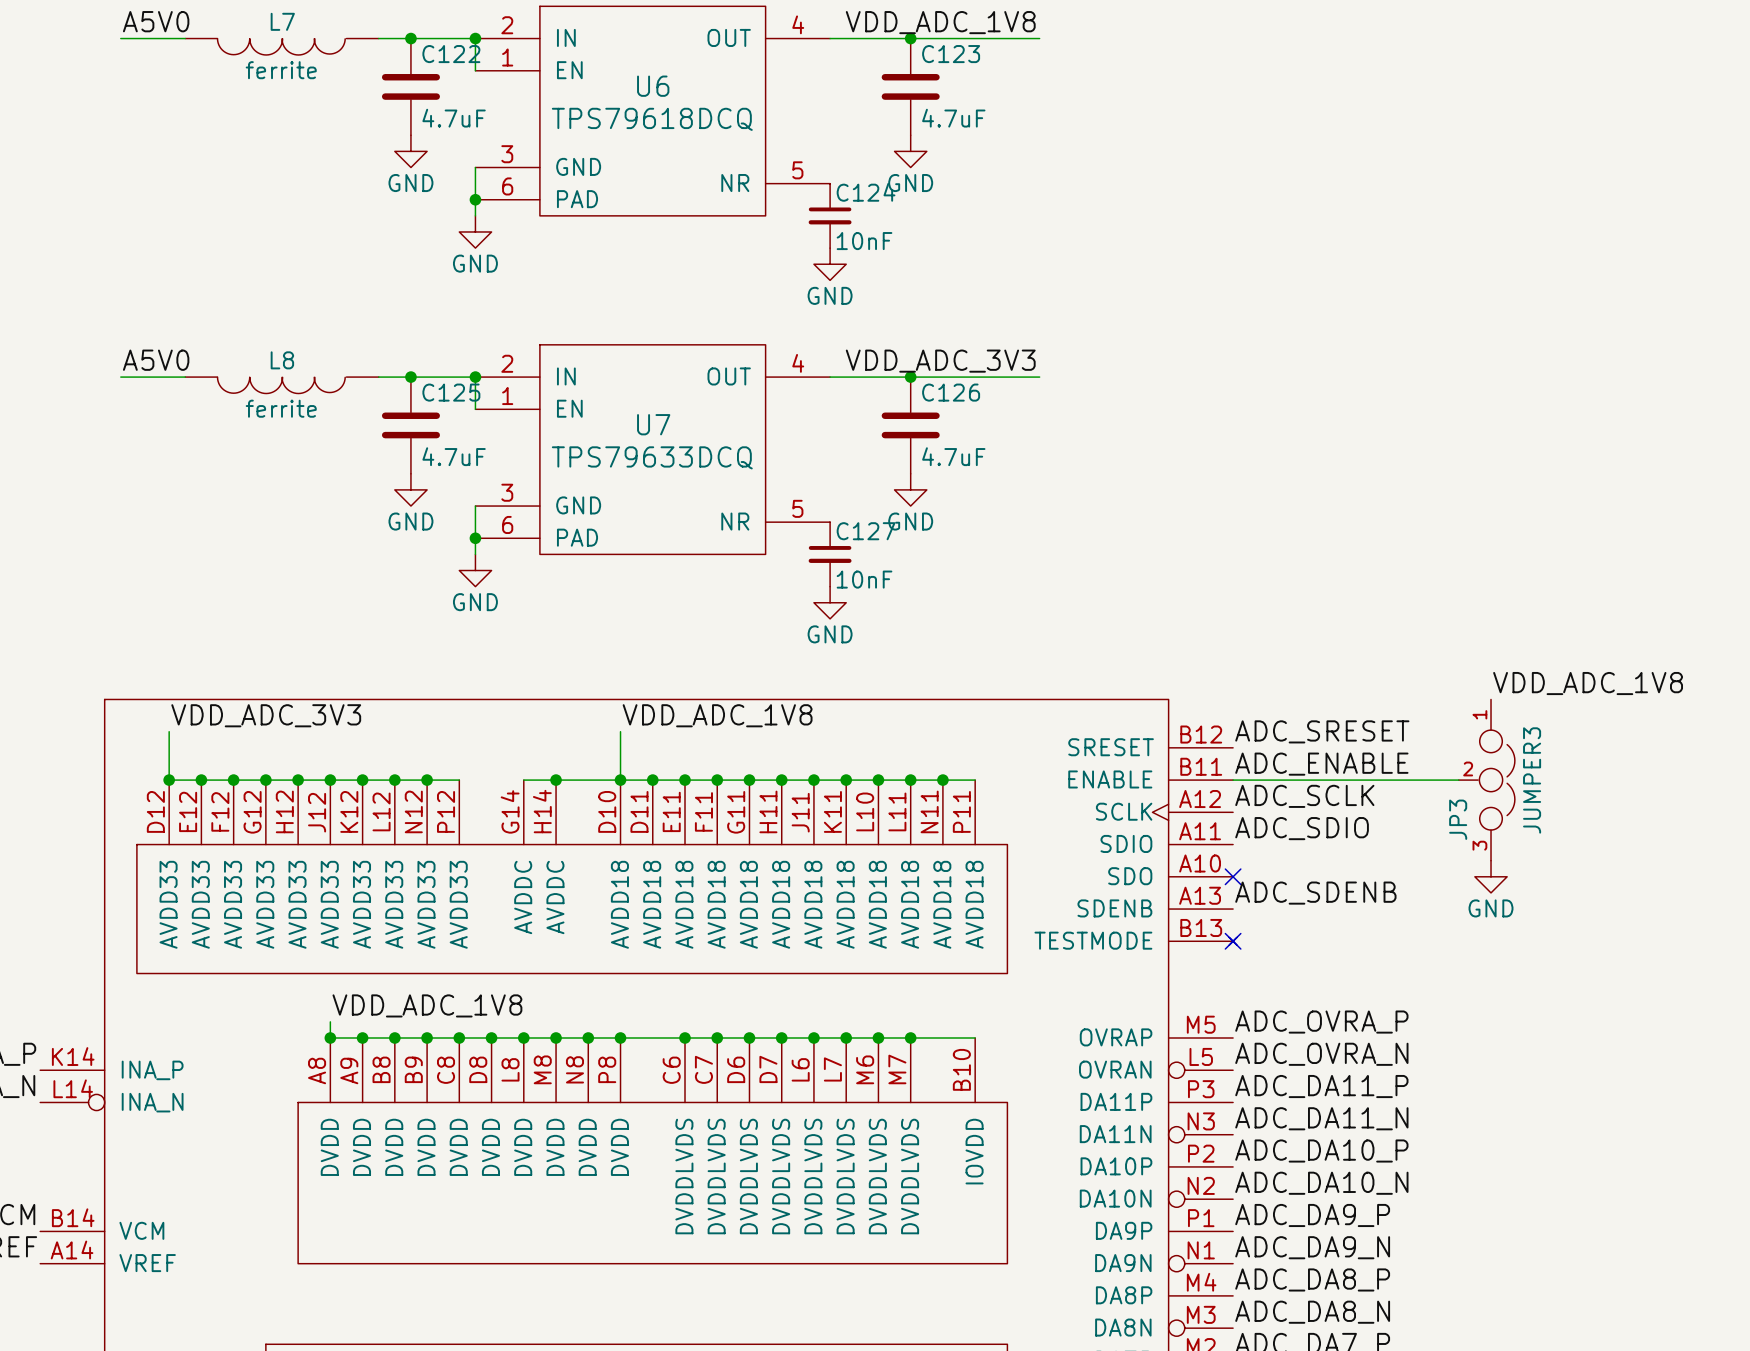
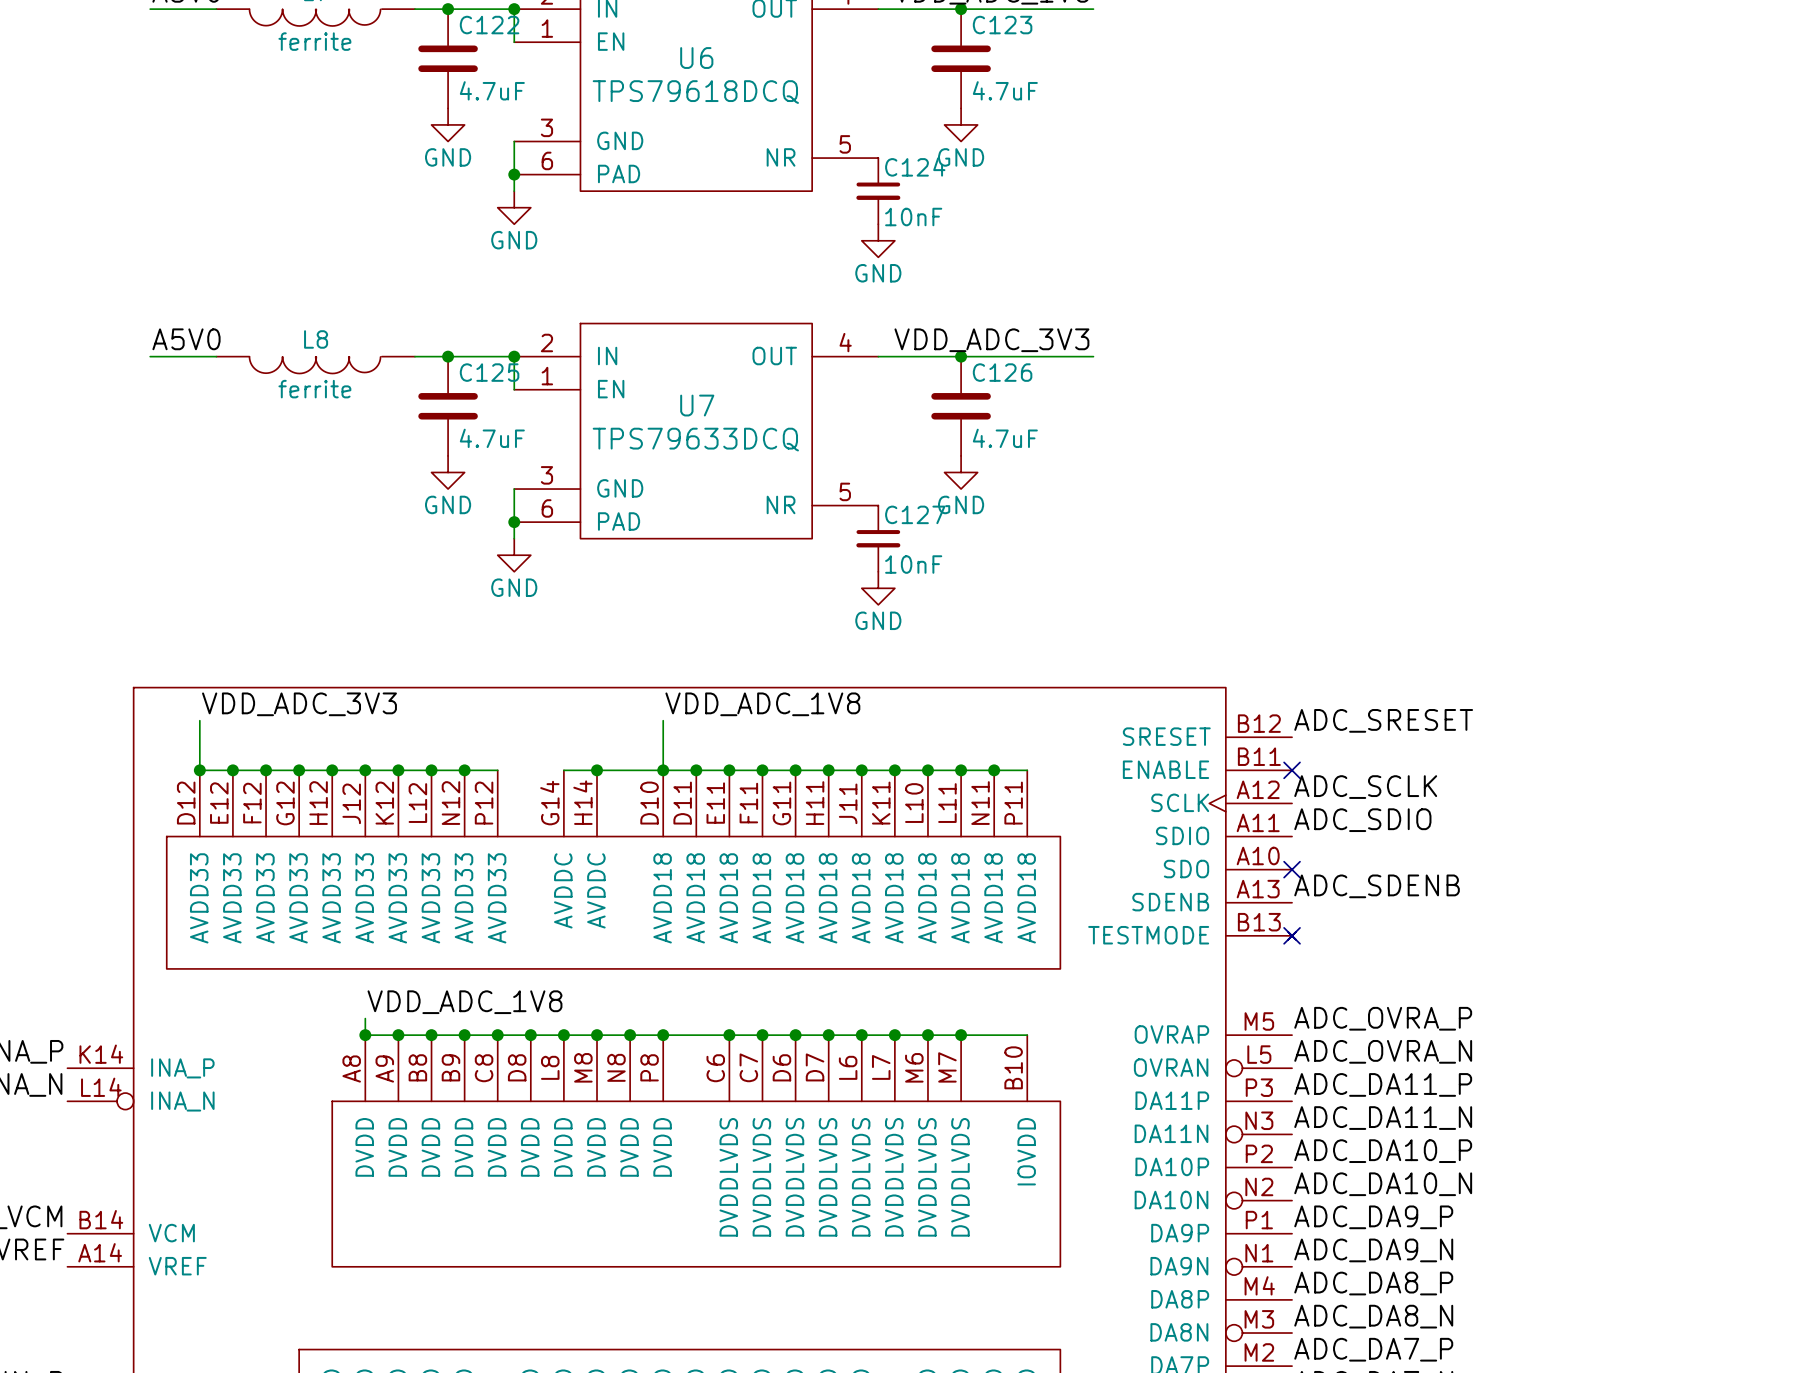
label: VDD_ADC_1V8 (1588, 683) -> none
label: ADC_ENABLE (1321, 764) -> none
wire: (1233, 780) (1458, 780) -> none
no-connect mark: none -> (1292, 770)
JP3: JUMPER3 (1486, 780) -> none
power symbol: GND (1491, 876) -> none

